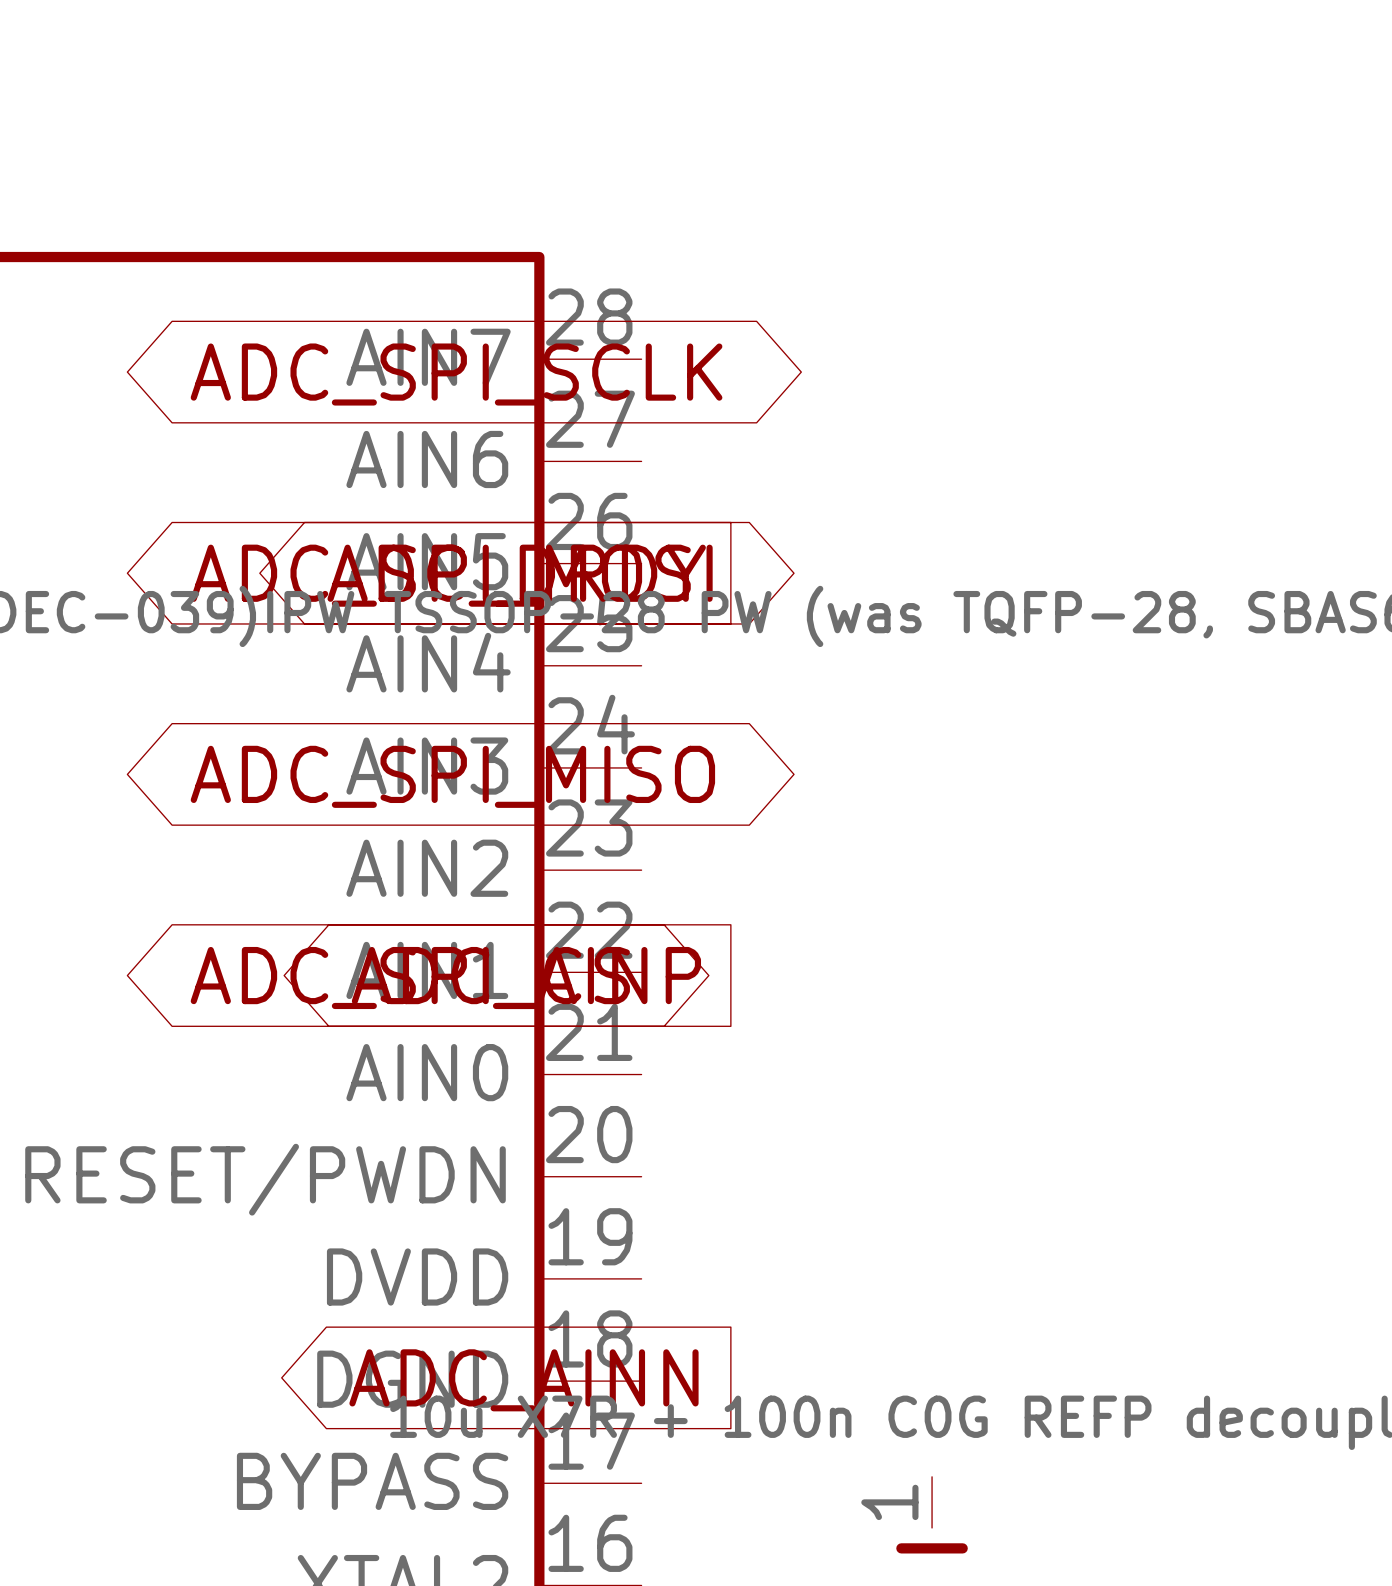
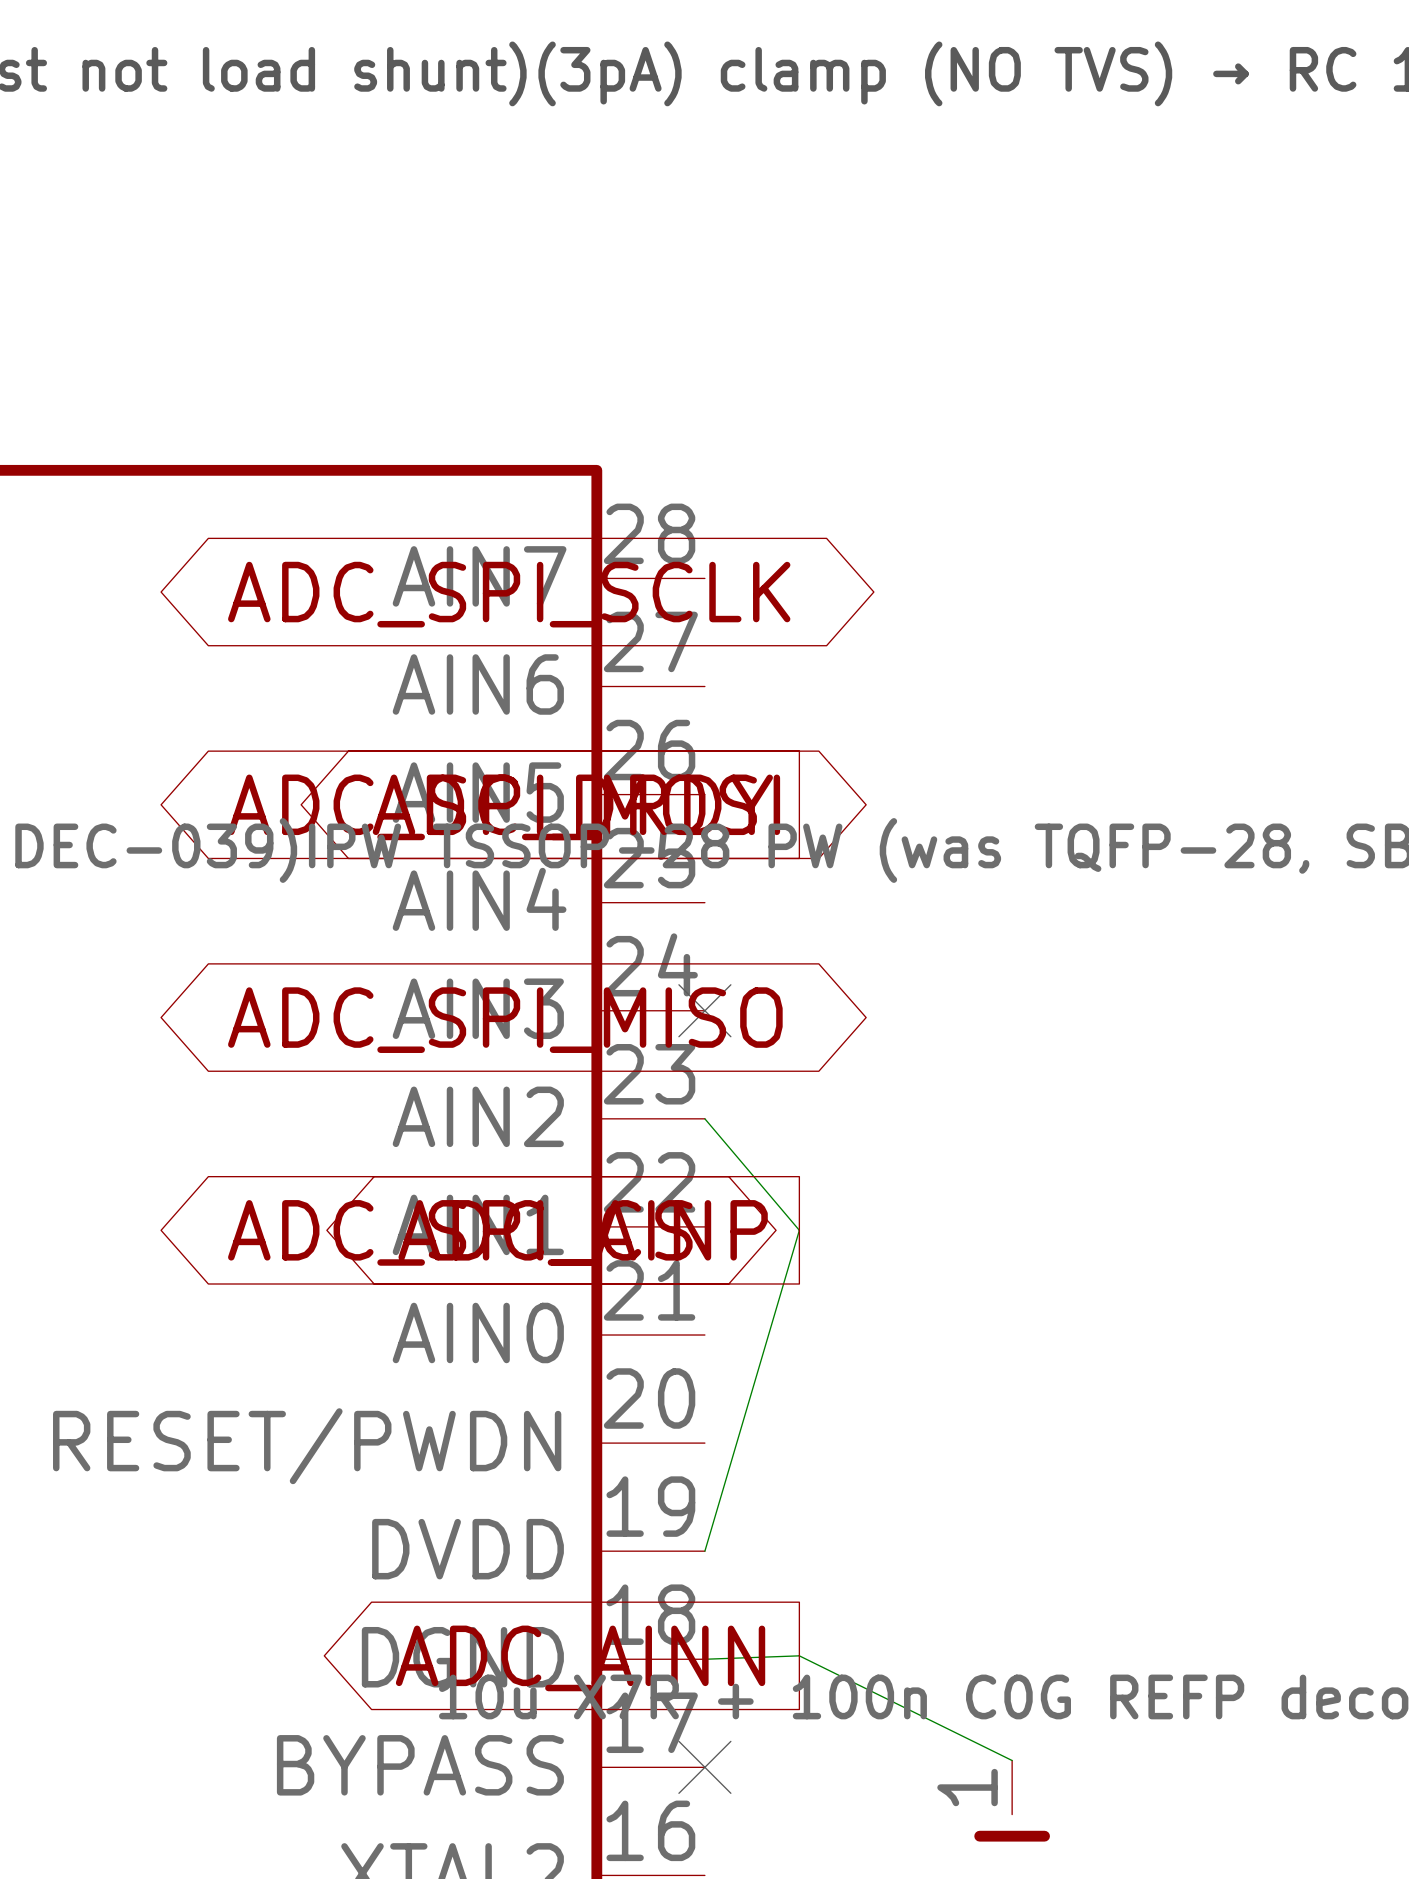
no-connect mark: none -> (704, 1010)
wire: none -> (704, 1118) (799, 1230) (704, 1551)
wire: none -> (704, 1659) (799, 1655) (1012, 1760)
no-connect mark: none -> (704, 1767)

